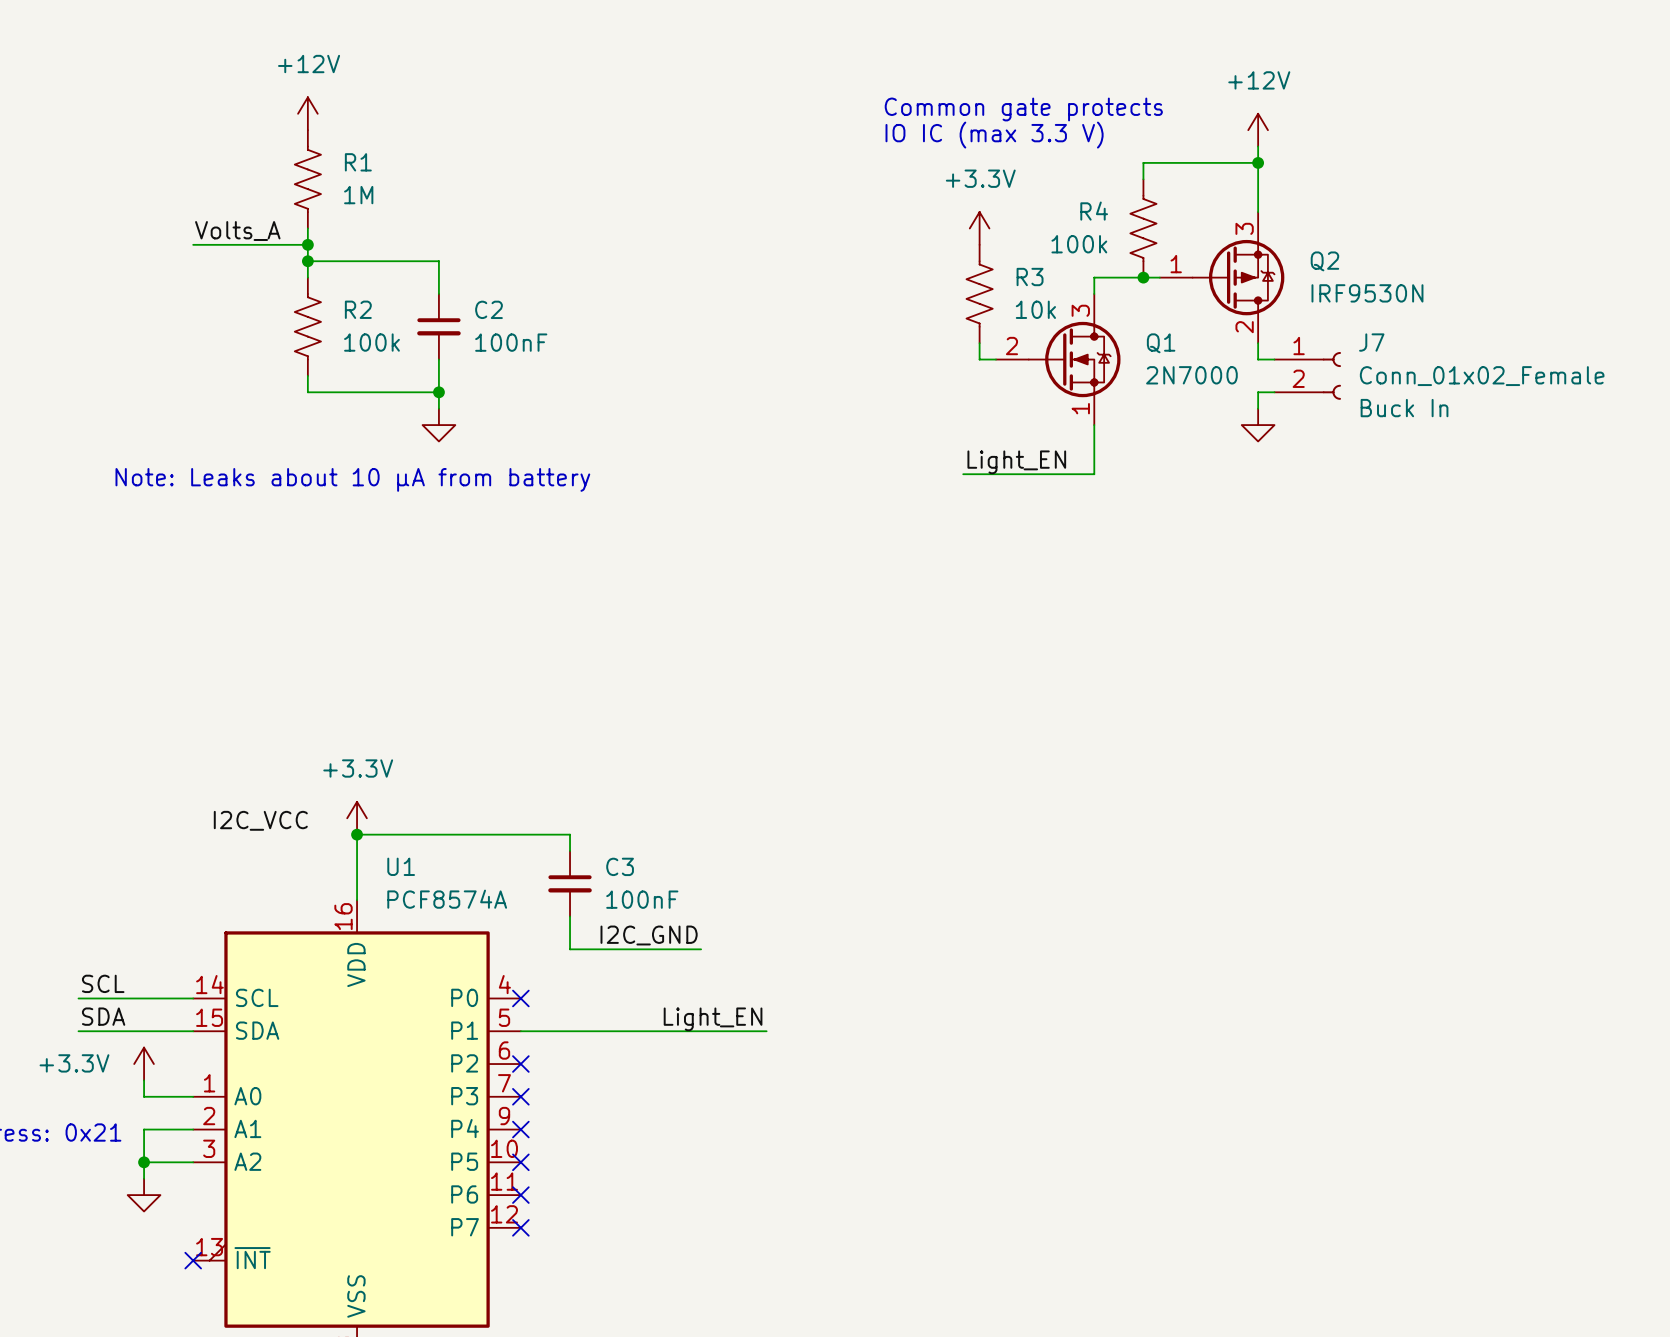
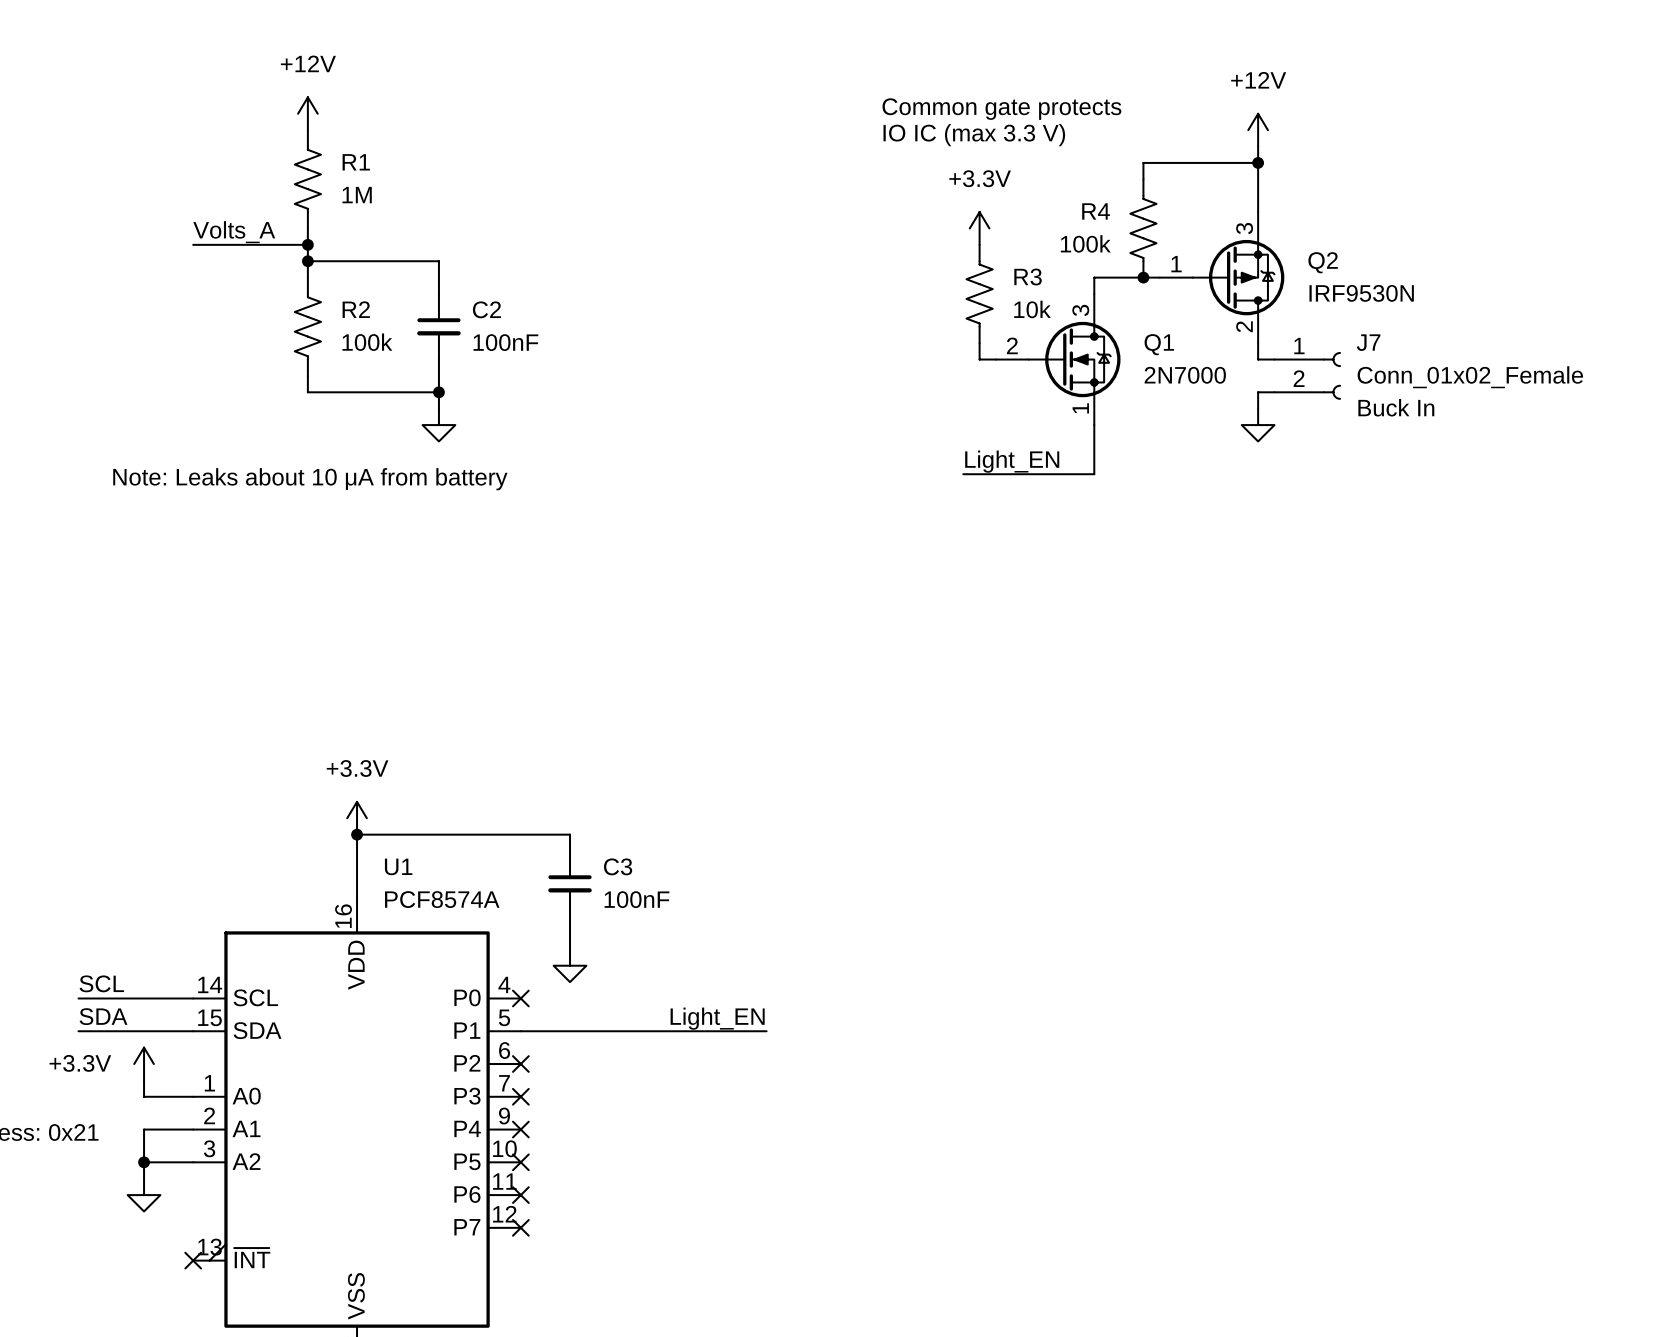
label: I2C_VCC (260, 820) -> none
label: I2C_GND (649, 935) -> none
wire: (570, 949) (701, 949) -> none
power symbol: none -> (570, 965)

